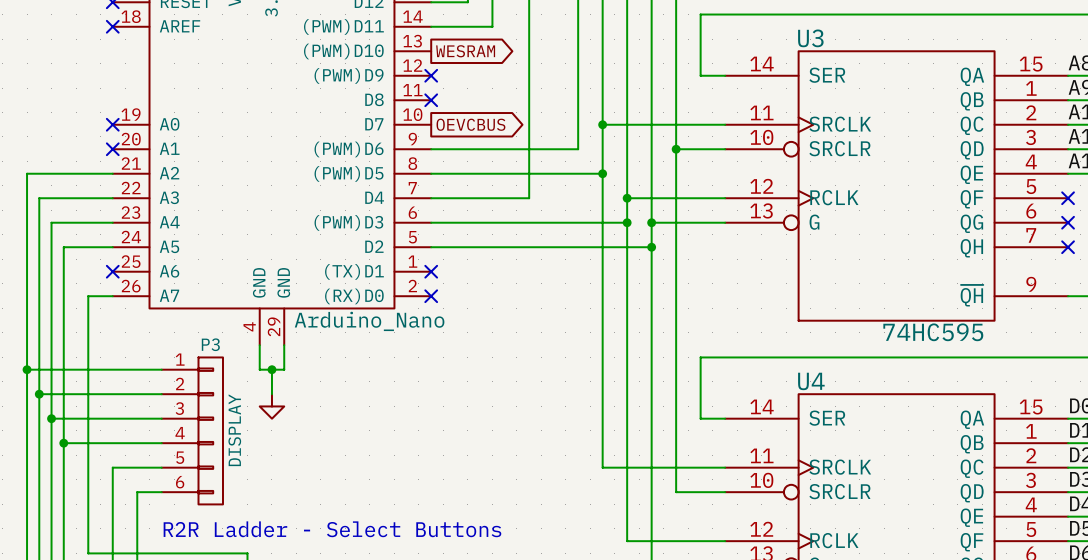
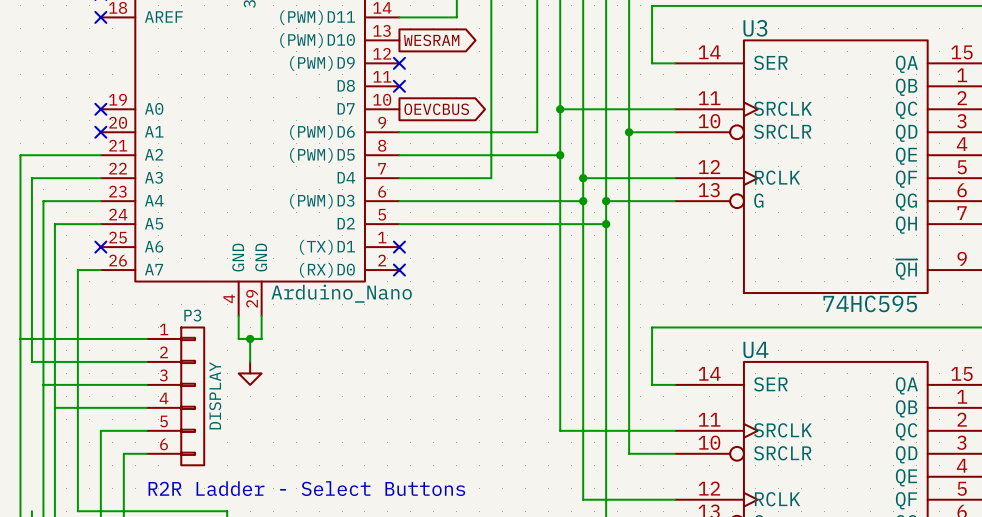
junction: (27, 369) -> none
wire: (39, 394) (39, 553) -> none
junction: (39, 394) -> none
junction: (51, 418) -> none
junction: (63, 443) -> none

